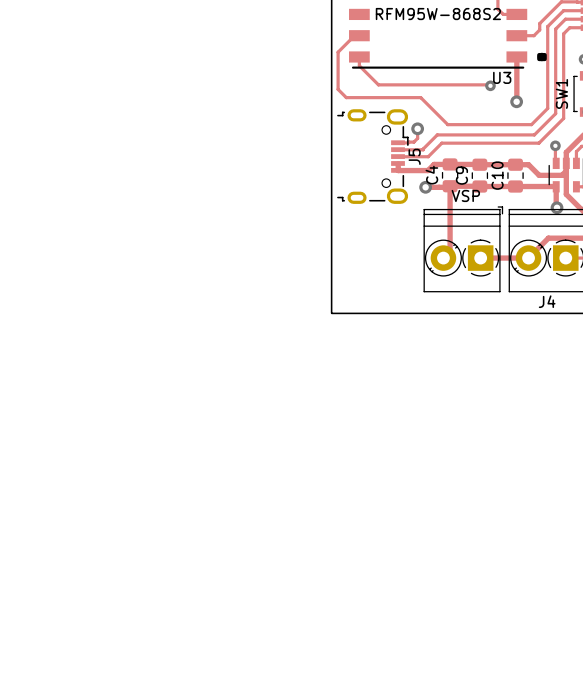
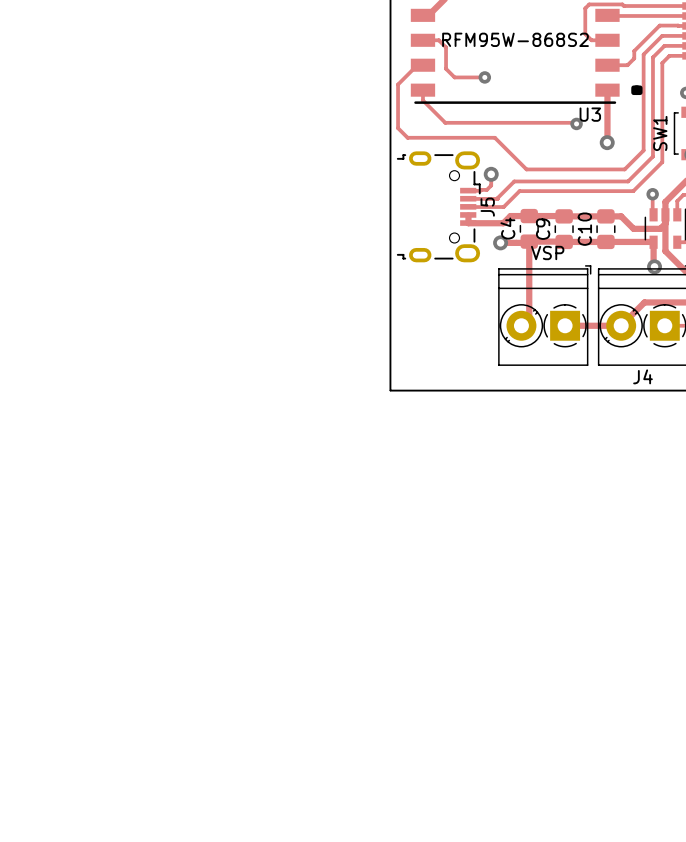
track: none -> (428, 40) (438, 40) (446, 47) (446, 68) (454, 77) (484, 77)
via: none -> (484, 77)

